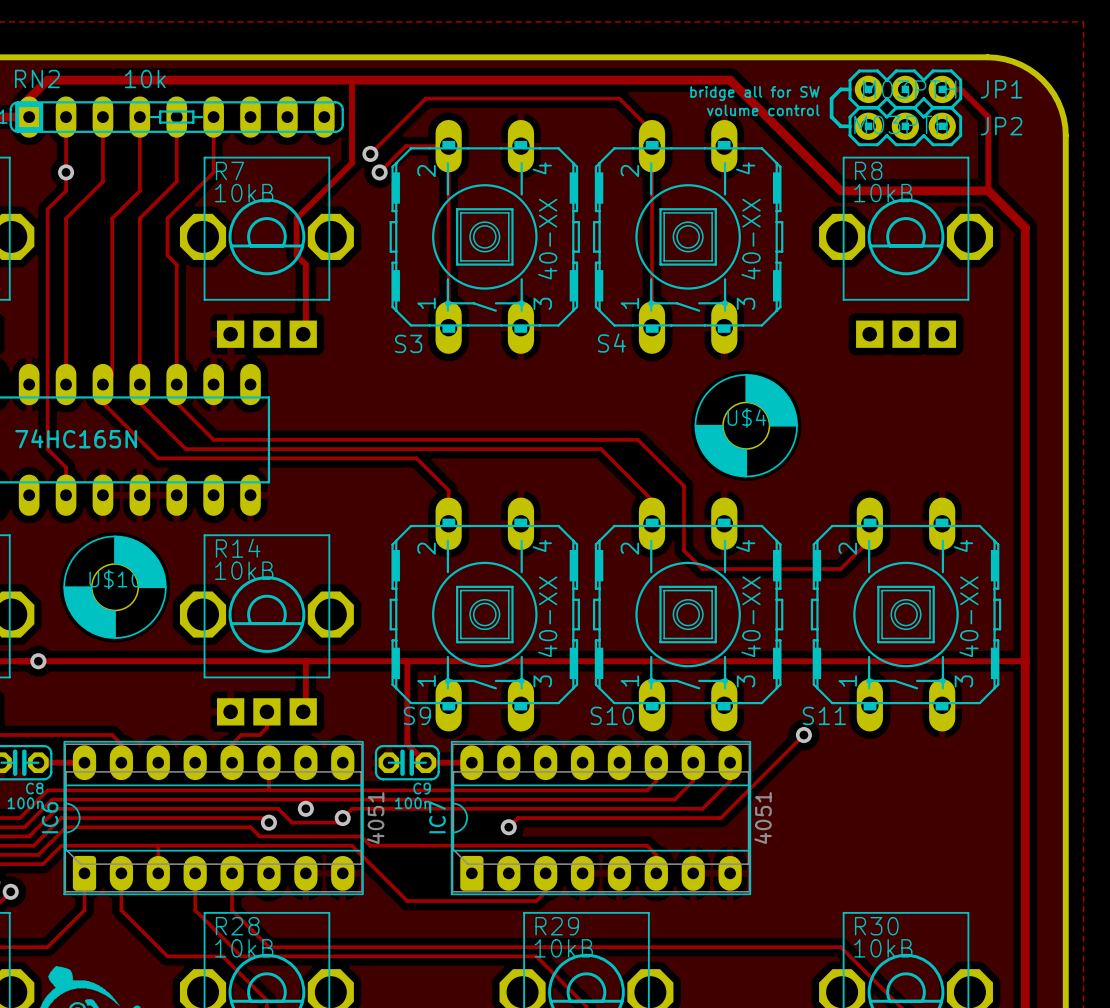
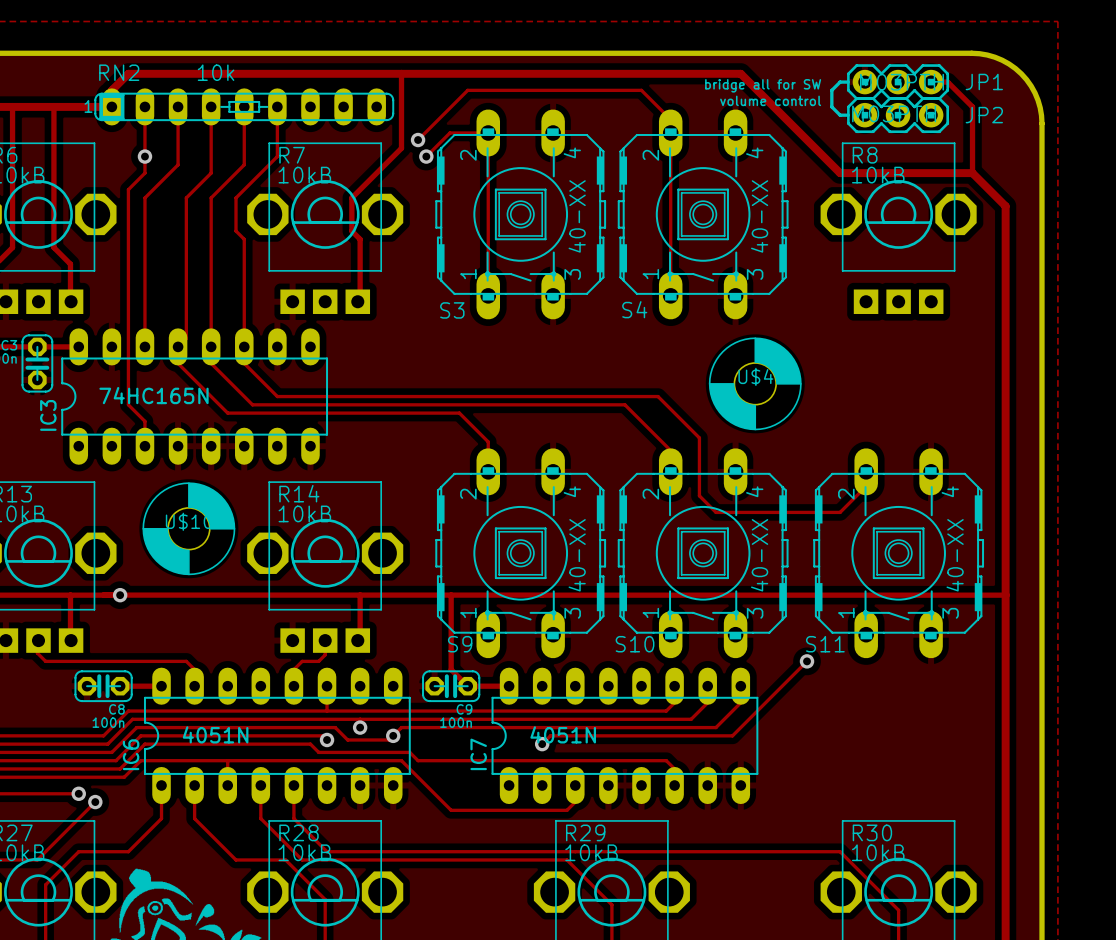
IC6 footprint: [63, 740, 364, 896] -> [143, 667, 411, 805]
IC7 footprint: [450, 740, 752, 896] -> [491, 667, 759, 805]
IC6 value: 4051 (375, 818) -> 4051N (215, 734)
IC7 value: 4051 (763, 818) -> 4051N (563, 734)

